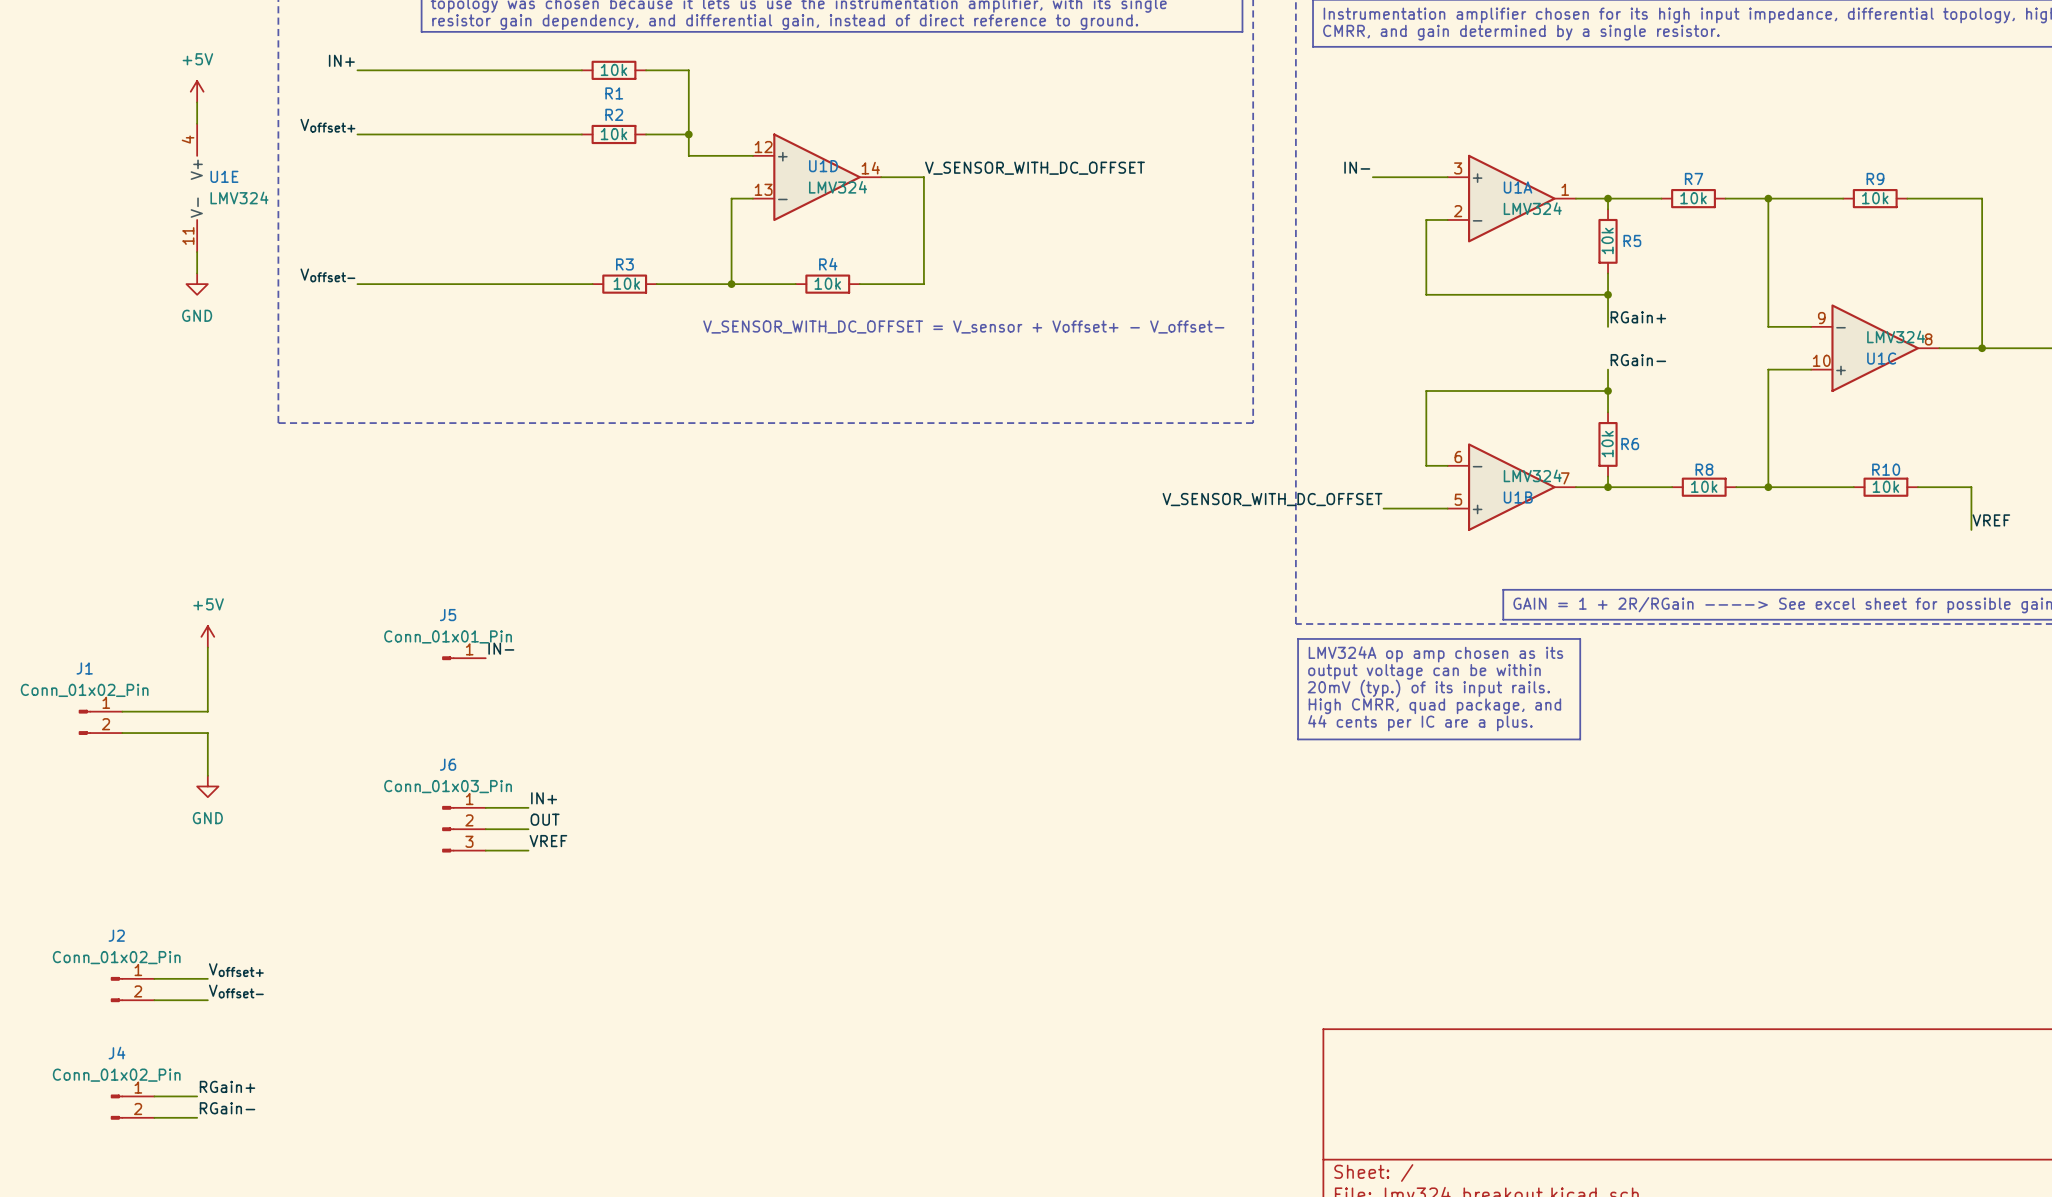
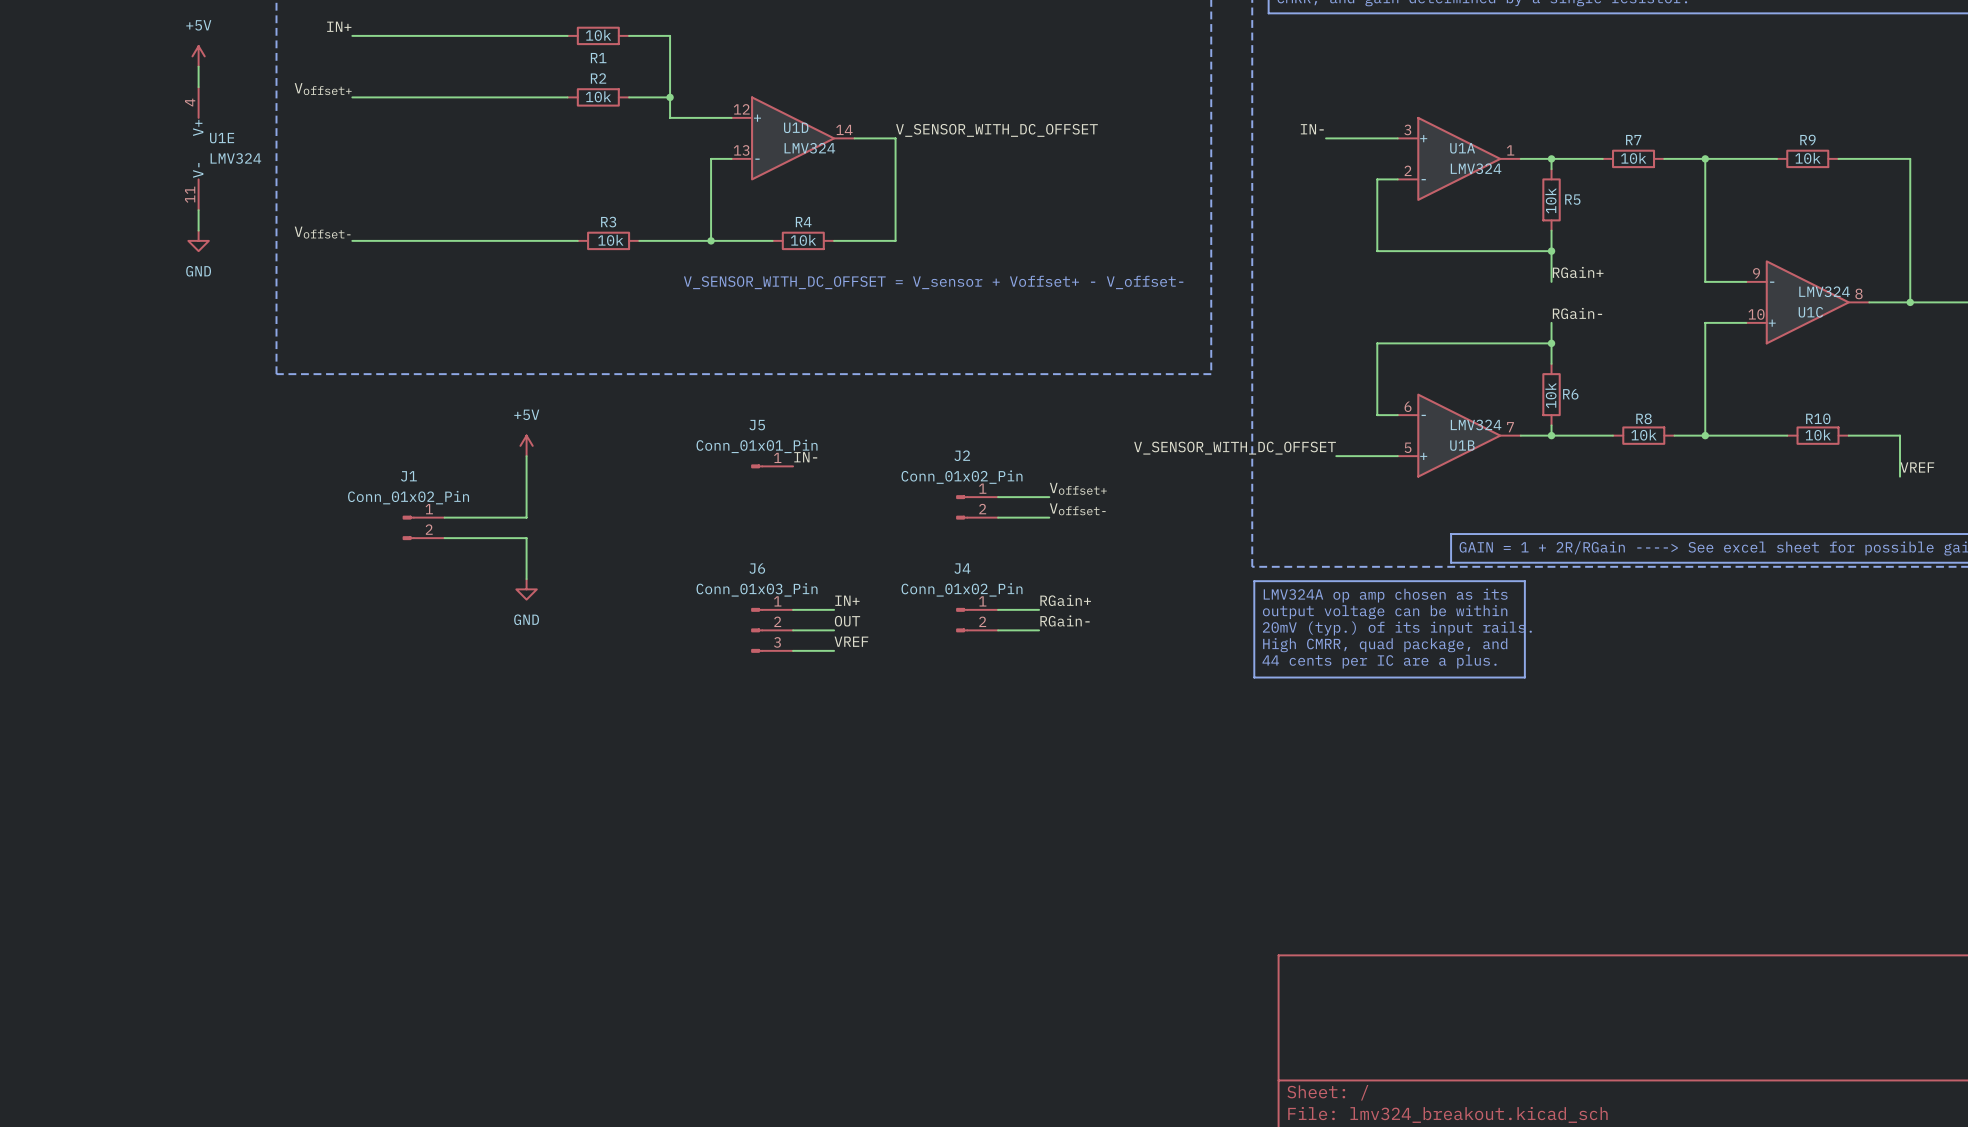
power symbol: none -> +5V (526, 445)
wire: none -> (526, 456) (526, 517) (444, 517)
label: none -> IN- (805, 457)
label: none -> Voffset+ (1078, 488)
wire: none -> (998, 497) (1049, 497)
label: none -> Voffset- (1077, 509)
wire: none -> (998, 517) (1049, 517)
wire: none -> (444, 538) (526, 538) (526, 579)
power symbol: +5V (207, 636) -> none
wire: (207, 647) (207, 711) (122, 711) -> none
power symbol: none -> GND (526, 589)
label: IN- (501, 648) -> none
J5 position: (464, 658) -> (772, 466)
label: none -> IN+ (847, 600)
label: none -> RGain+ (1065, 600)
wire: none -> (793, 609) (834, 609)
wire: none -> (998, 609) (1039, 609)
label: none -> OUT (847, 621)
label: none -> RGain- (1065, 620)
wire: none -> (793, 630) (834, 630)
wire: none -> (998, 630) (1039, 630)
label: none -> VREF (851, 641)
wire: none -> (793, 650) (834, 650)
J1 position: (100, 722) -> (423, 527)
wire: (122, 733) (207, 733) (207, 775) -> none
power symbol: GND (207, 786) -> none
label: IN+ (544, 798) -> none
wire: (485, 807) (528, 807) -> none
label: OUT (545, 819) -> none
J6 position: (464, 829) -> (772, 630)
wire: (485, 829) (528, 829) -> none
label: VREF (548, 841) -> none
wire: (485, 850) (528, 850) -> none
label: Voffset+ (236, 970) -> none
wire: (154, 978) (207, 978) -> none
J2 position: (132, 989) -> (977, 507)
label: Voffset- (236, 991) -> none
wire: (154, 1000) (207, 1000) -> none
label: RGain+ (227, 1086) -> none
wire: (154, 1096) (197, 1096) -> none
J4 position: (132, 1107) -> (977, 620)
label: RGain- (227, 1108) -> none
wire: (154, 1117) (197, 1117) -> none

